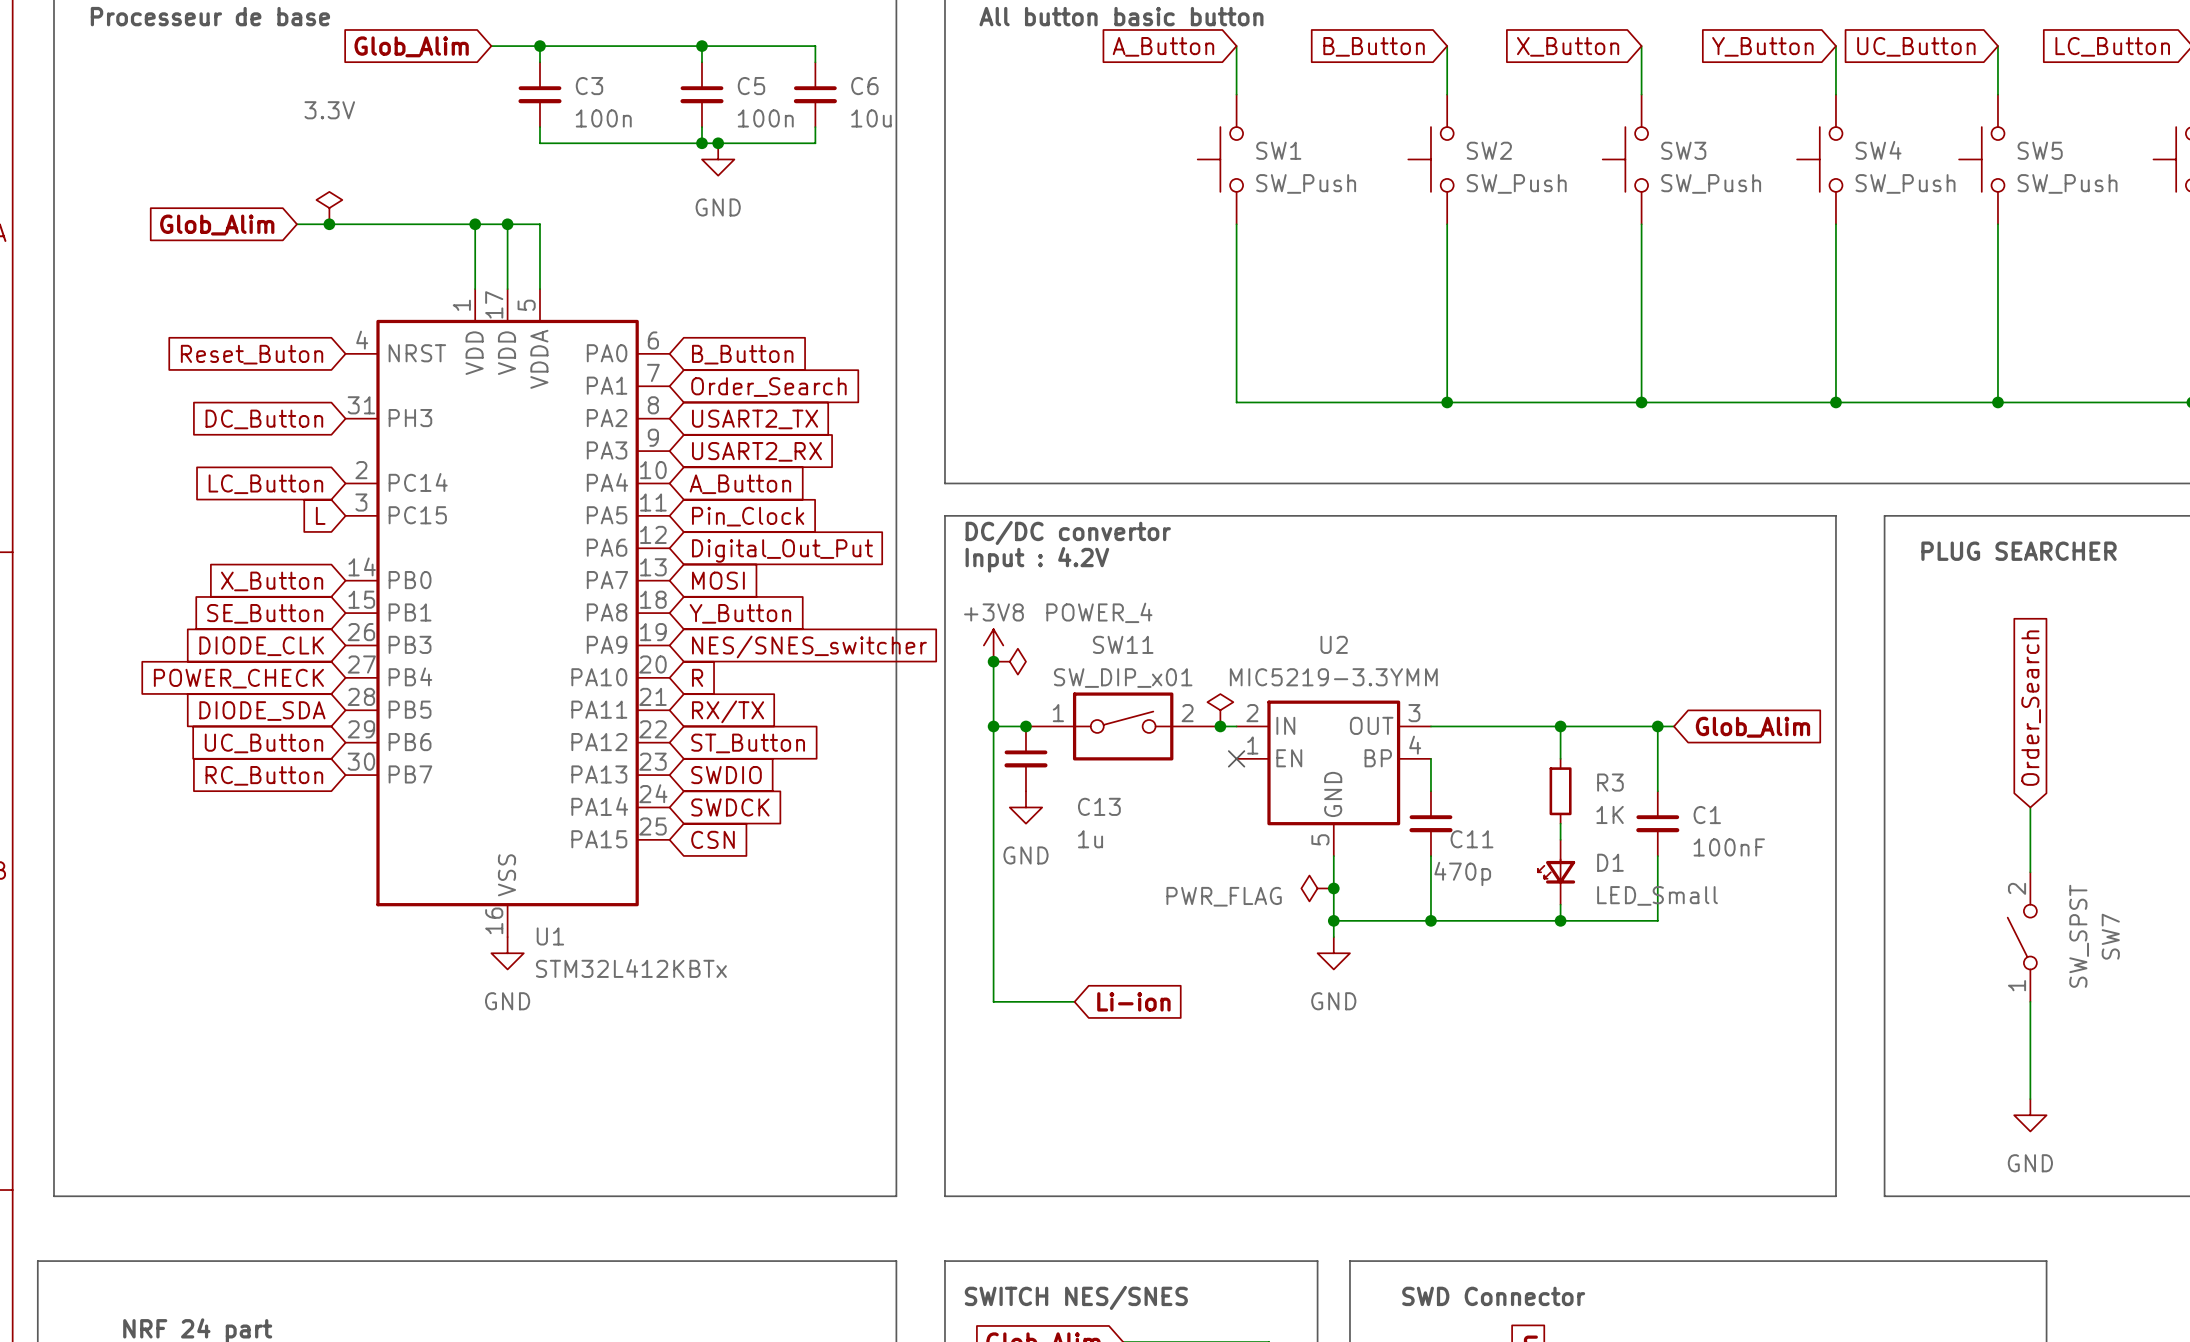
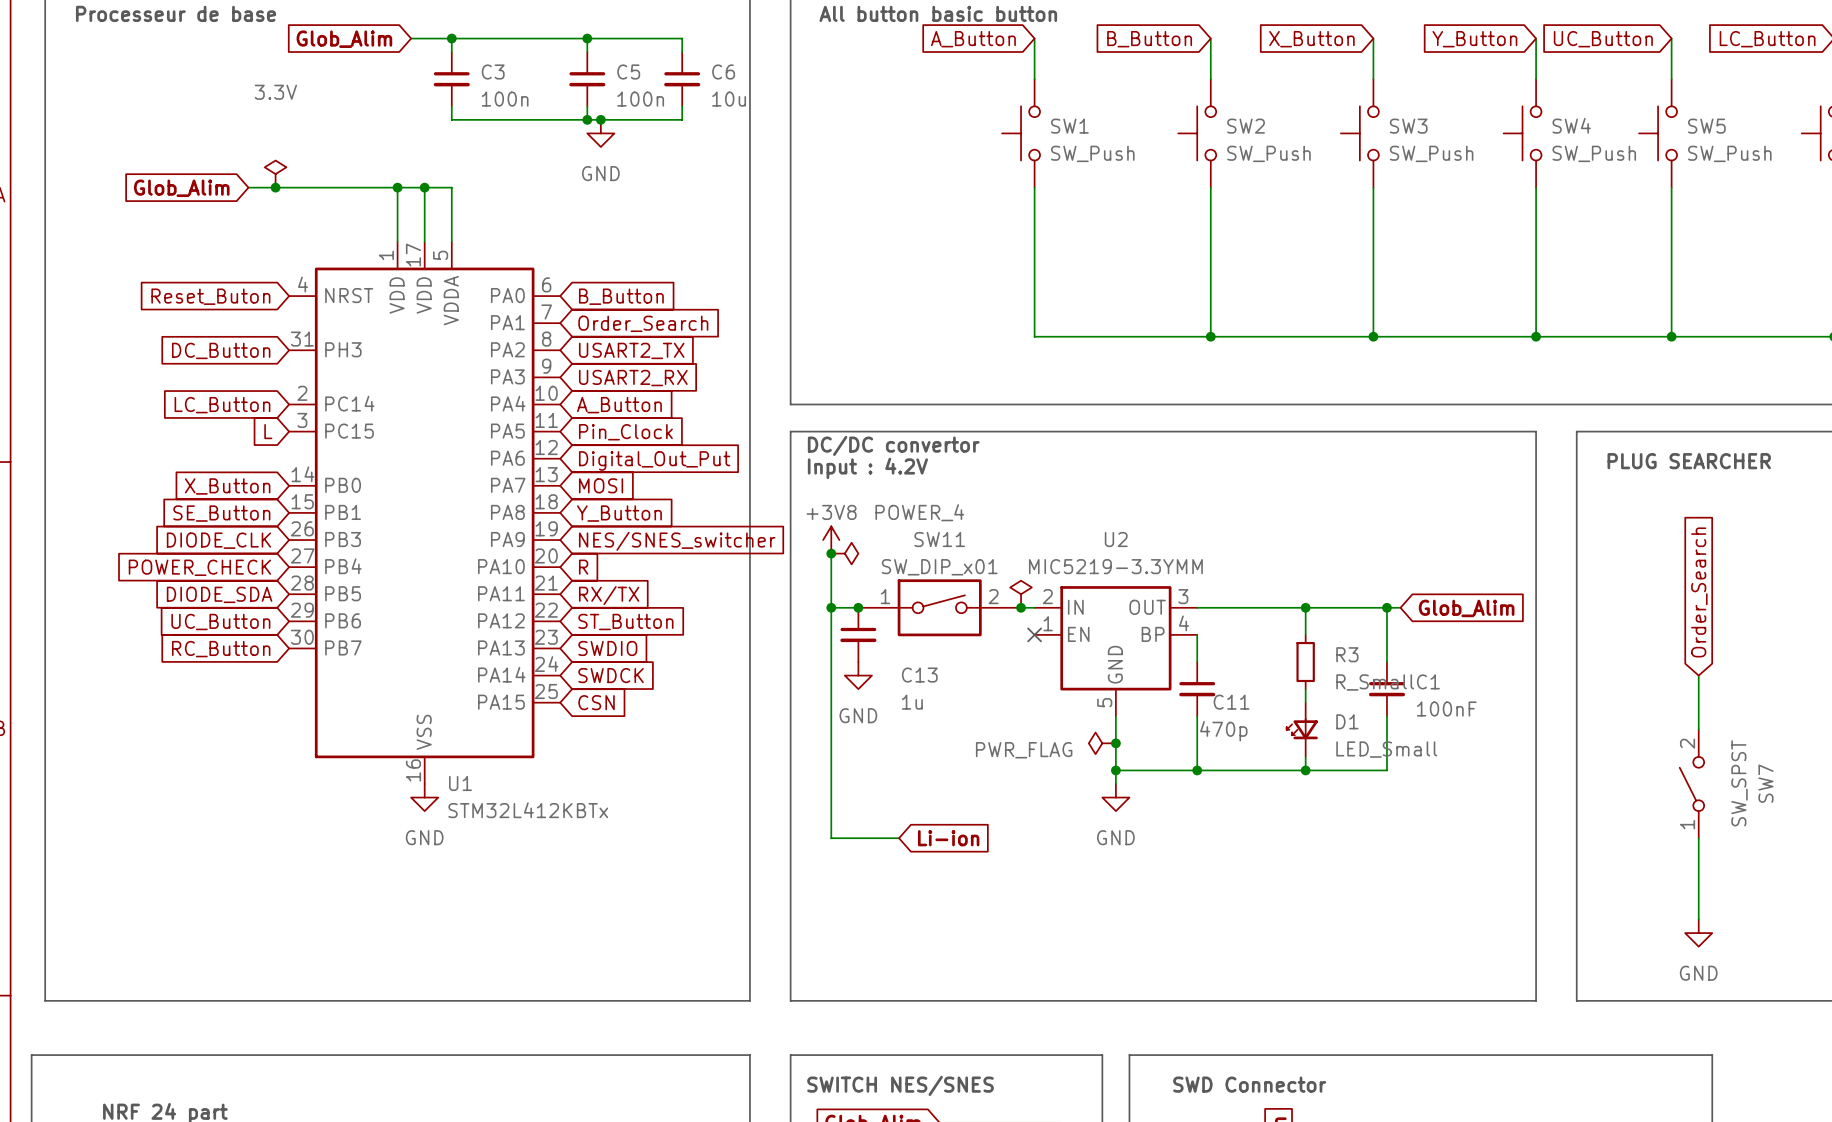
R3 value: 1K (1610, 814) -> R_Small (1375, 682)

